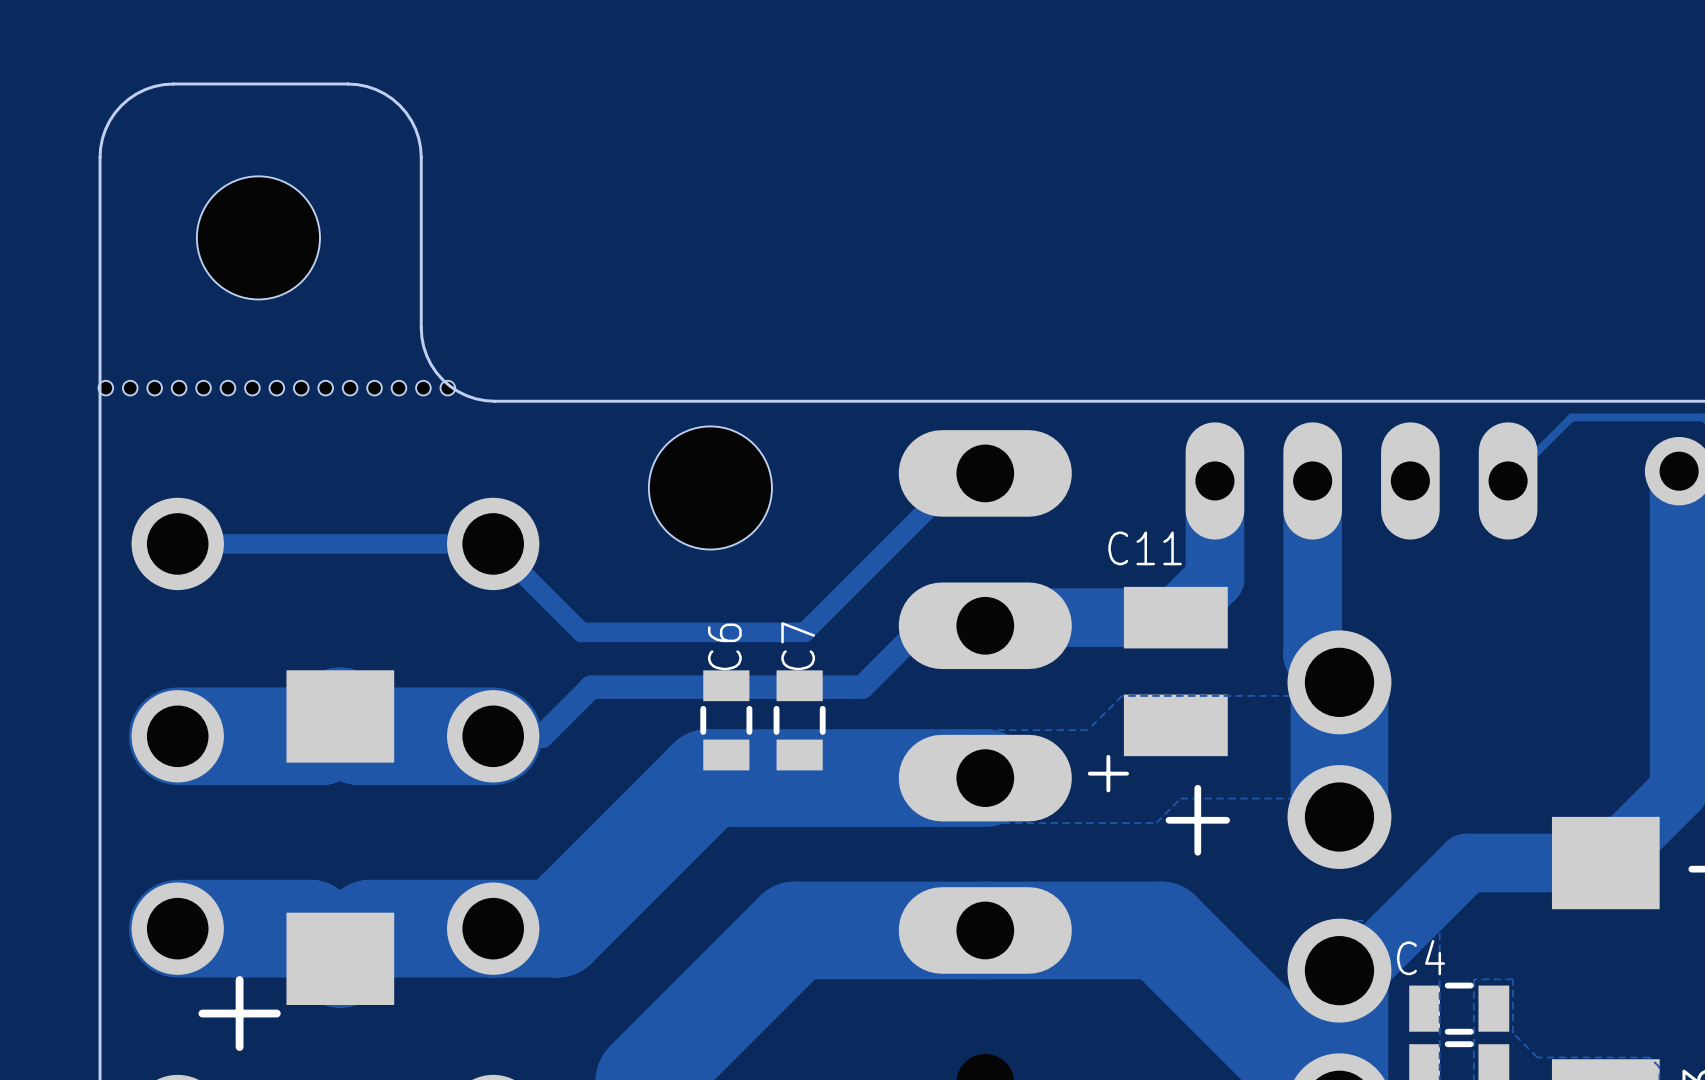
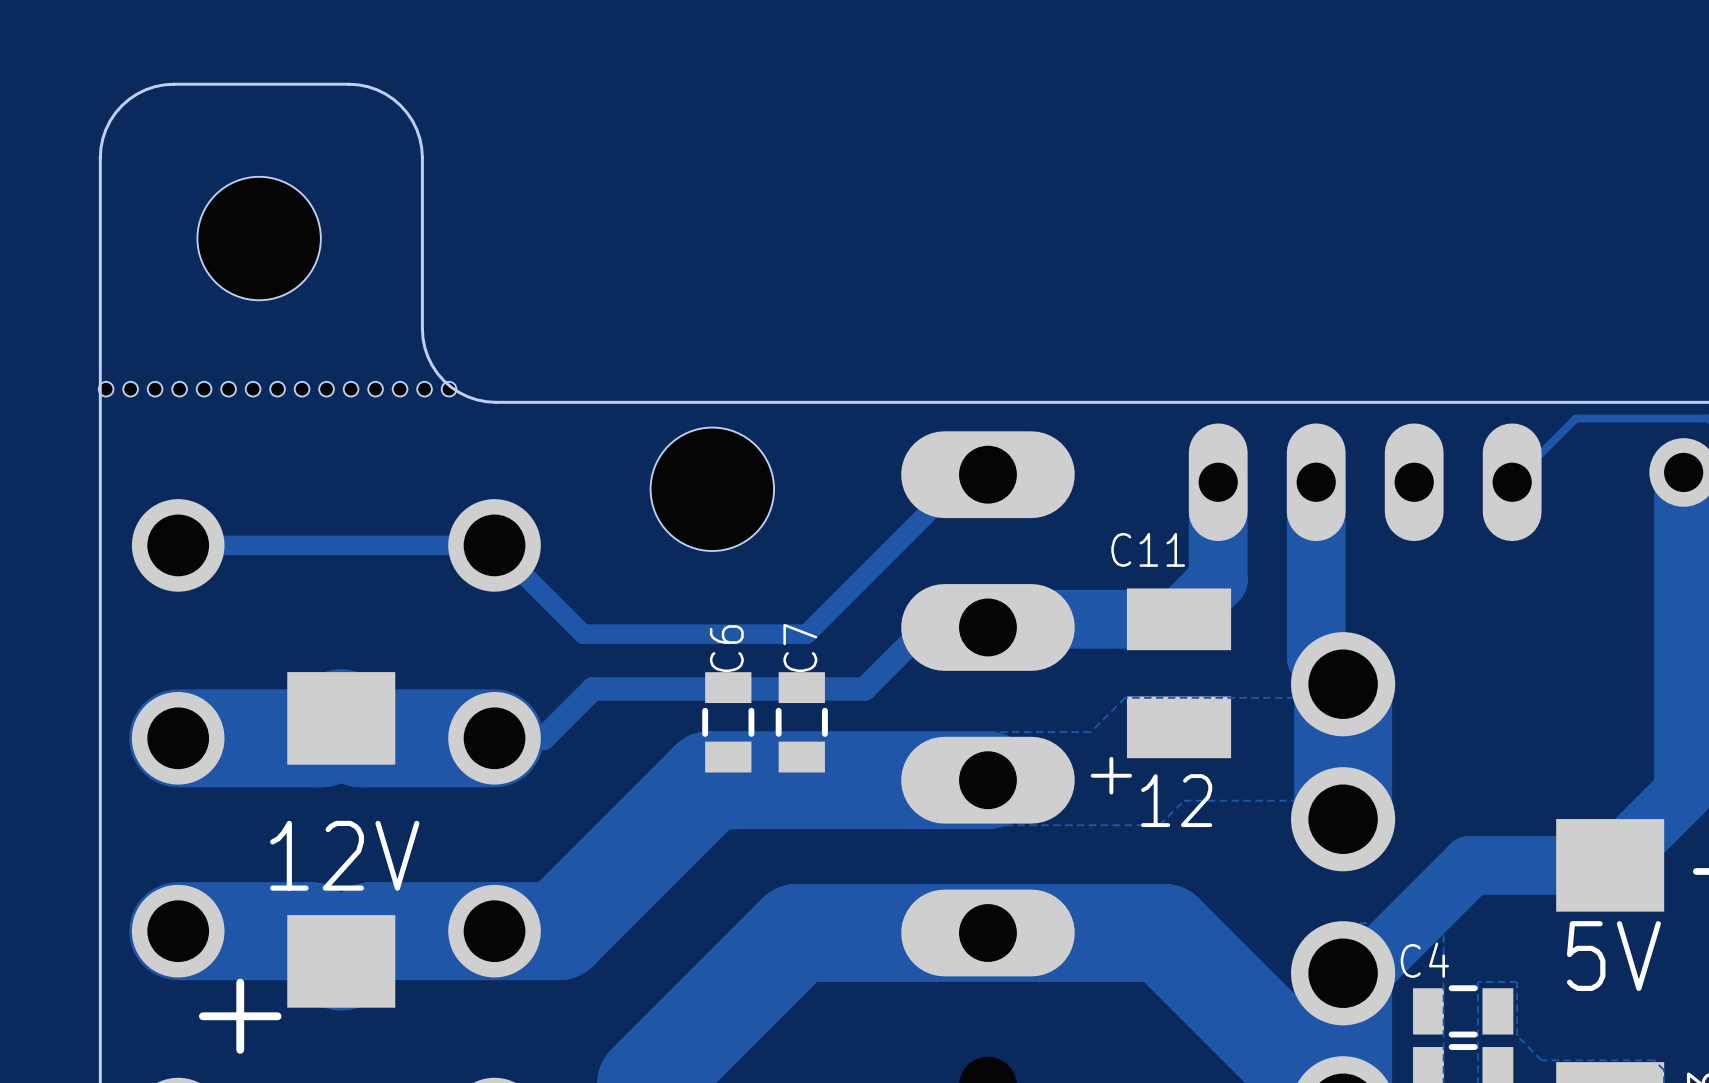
text: none -> 12 (1176, 800)
text: + (1197, 820) -> none
text: none -> 12V (344, 855)
text: none -> 5V (1613, 956)

